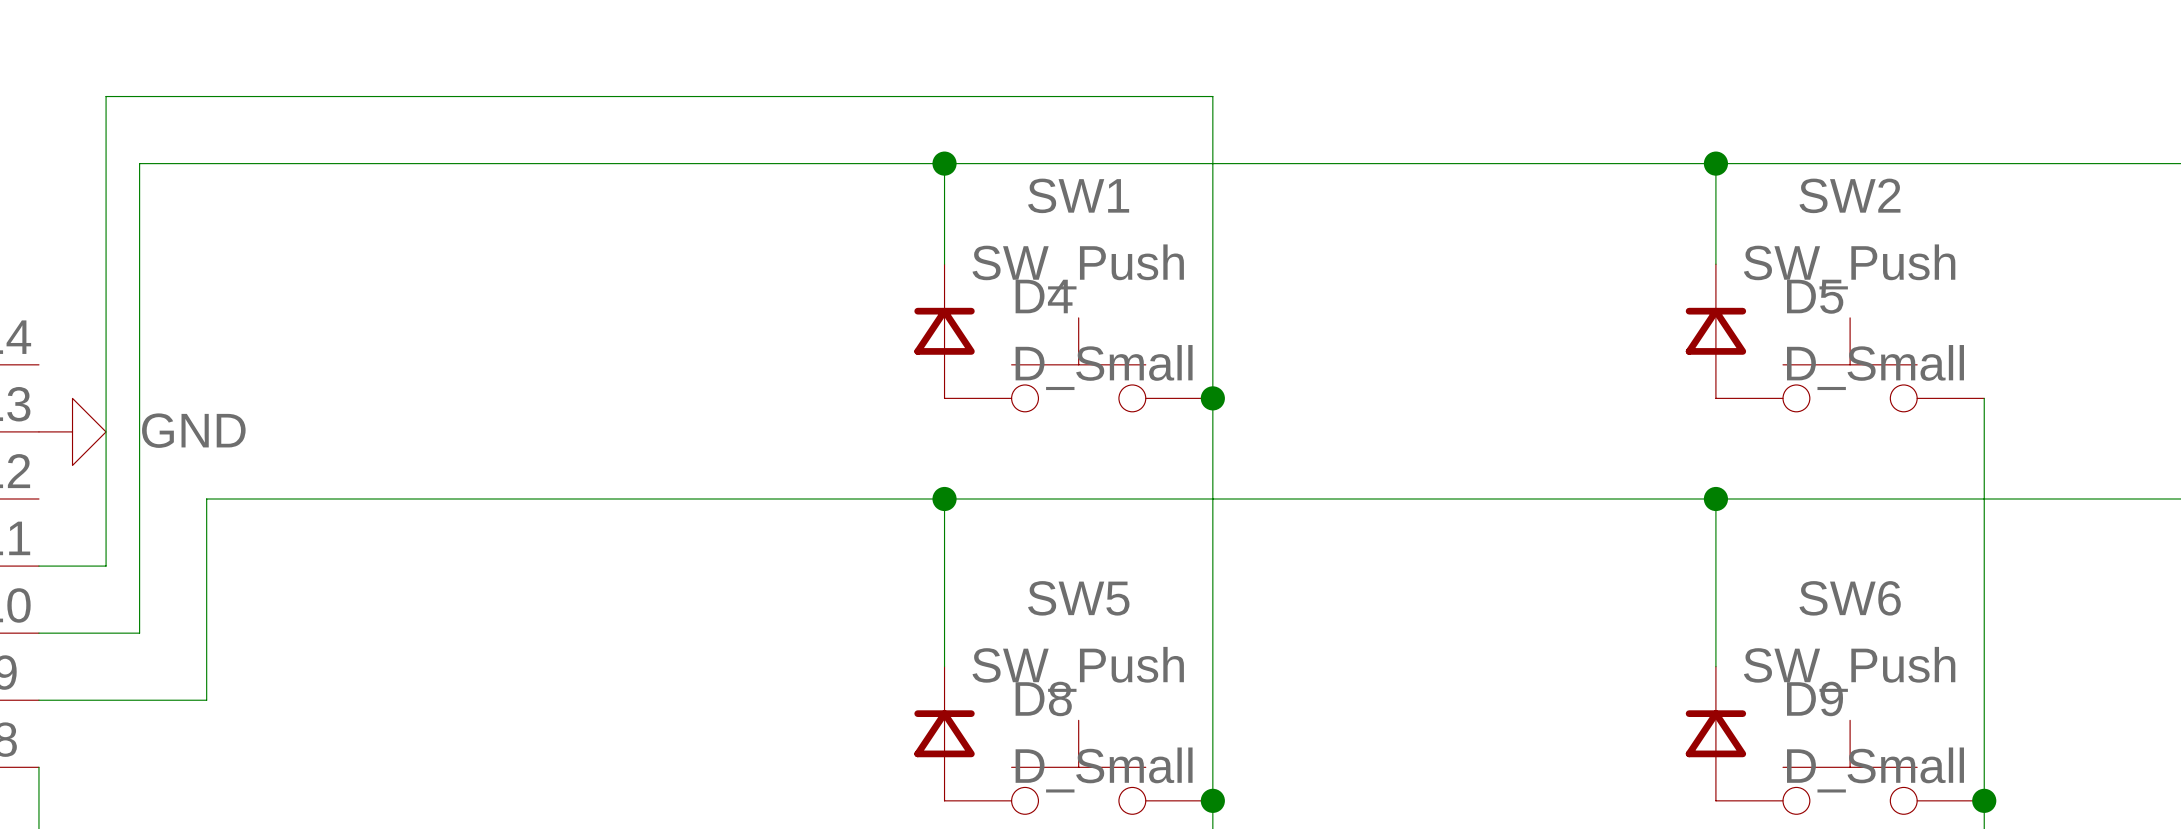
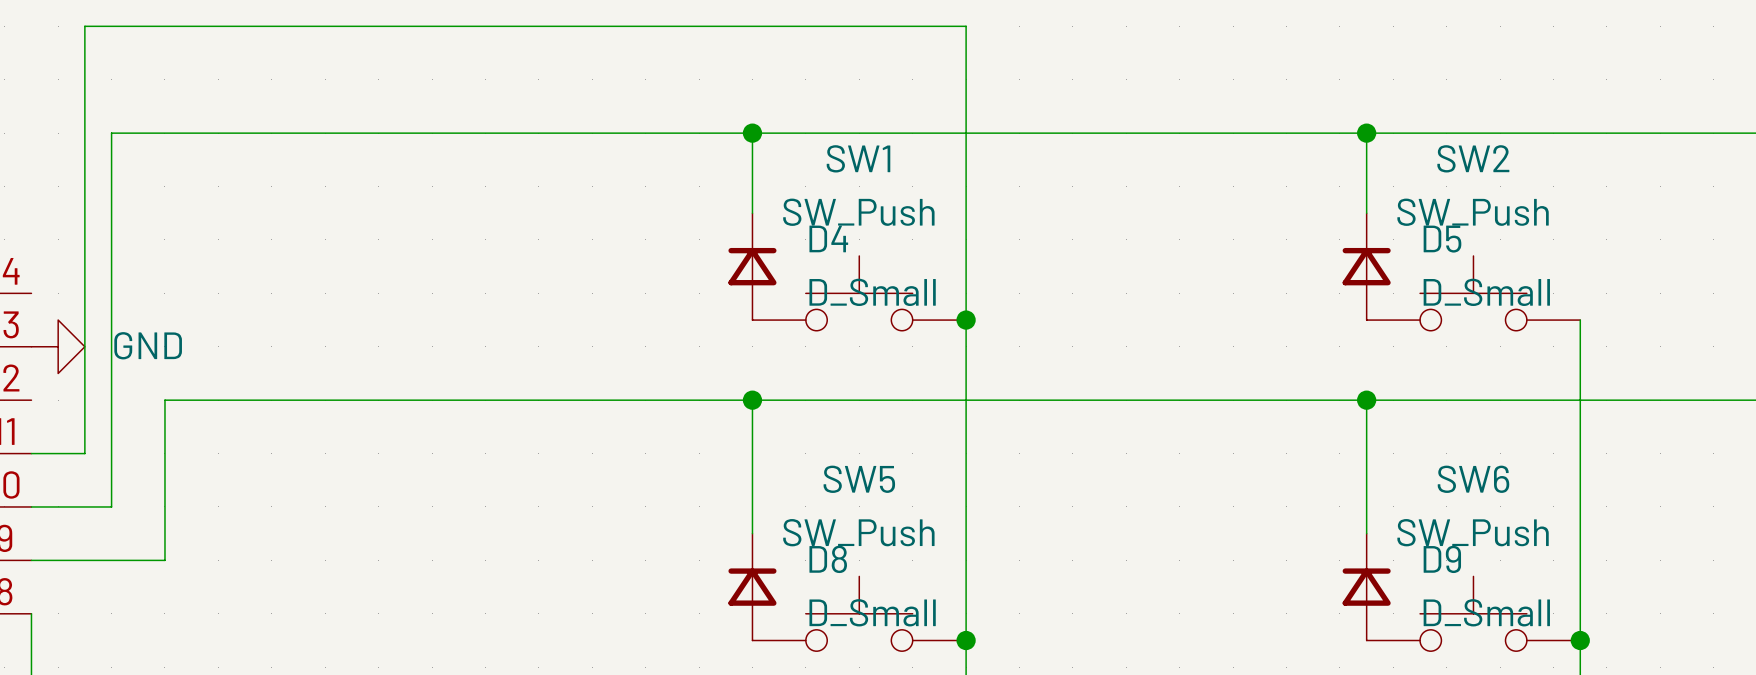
wire: (106, 96) (1212, 96) -> (84, 79) (84, 26) (966, 26) (966, 79)

